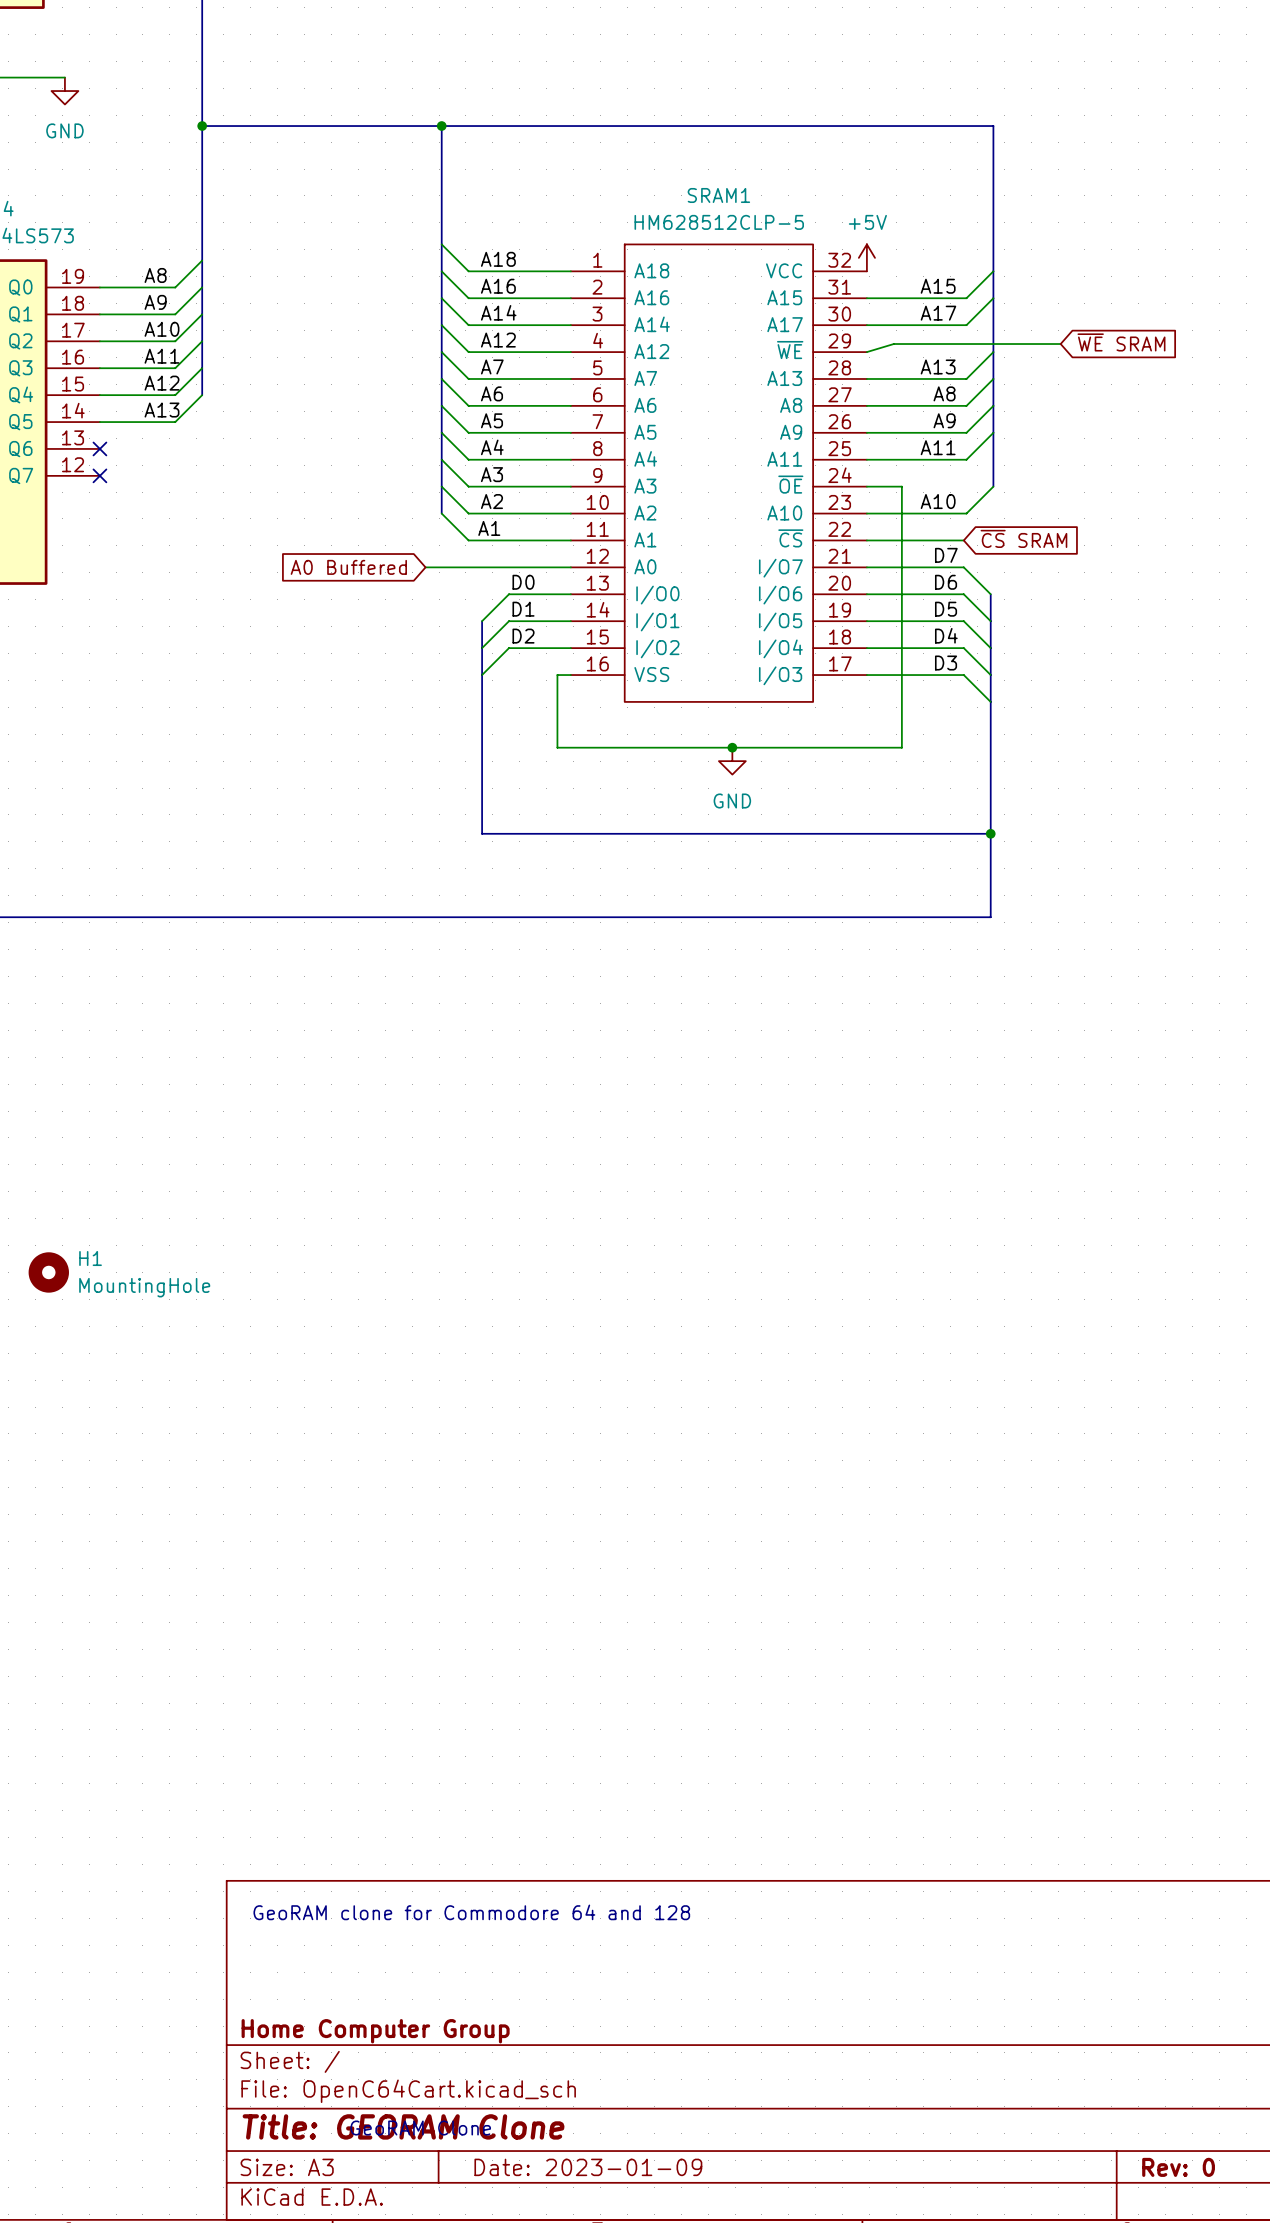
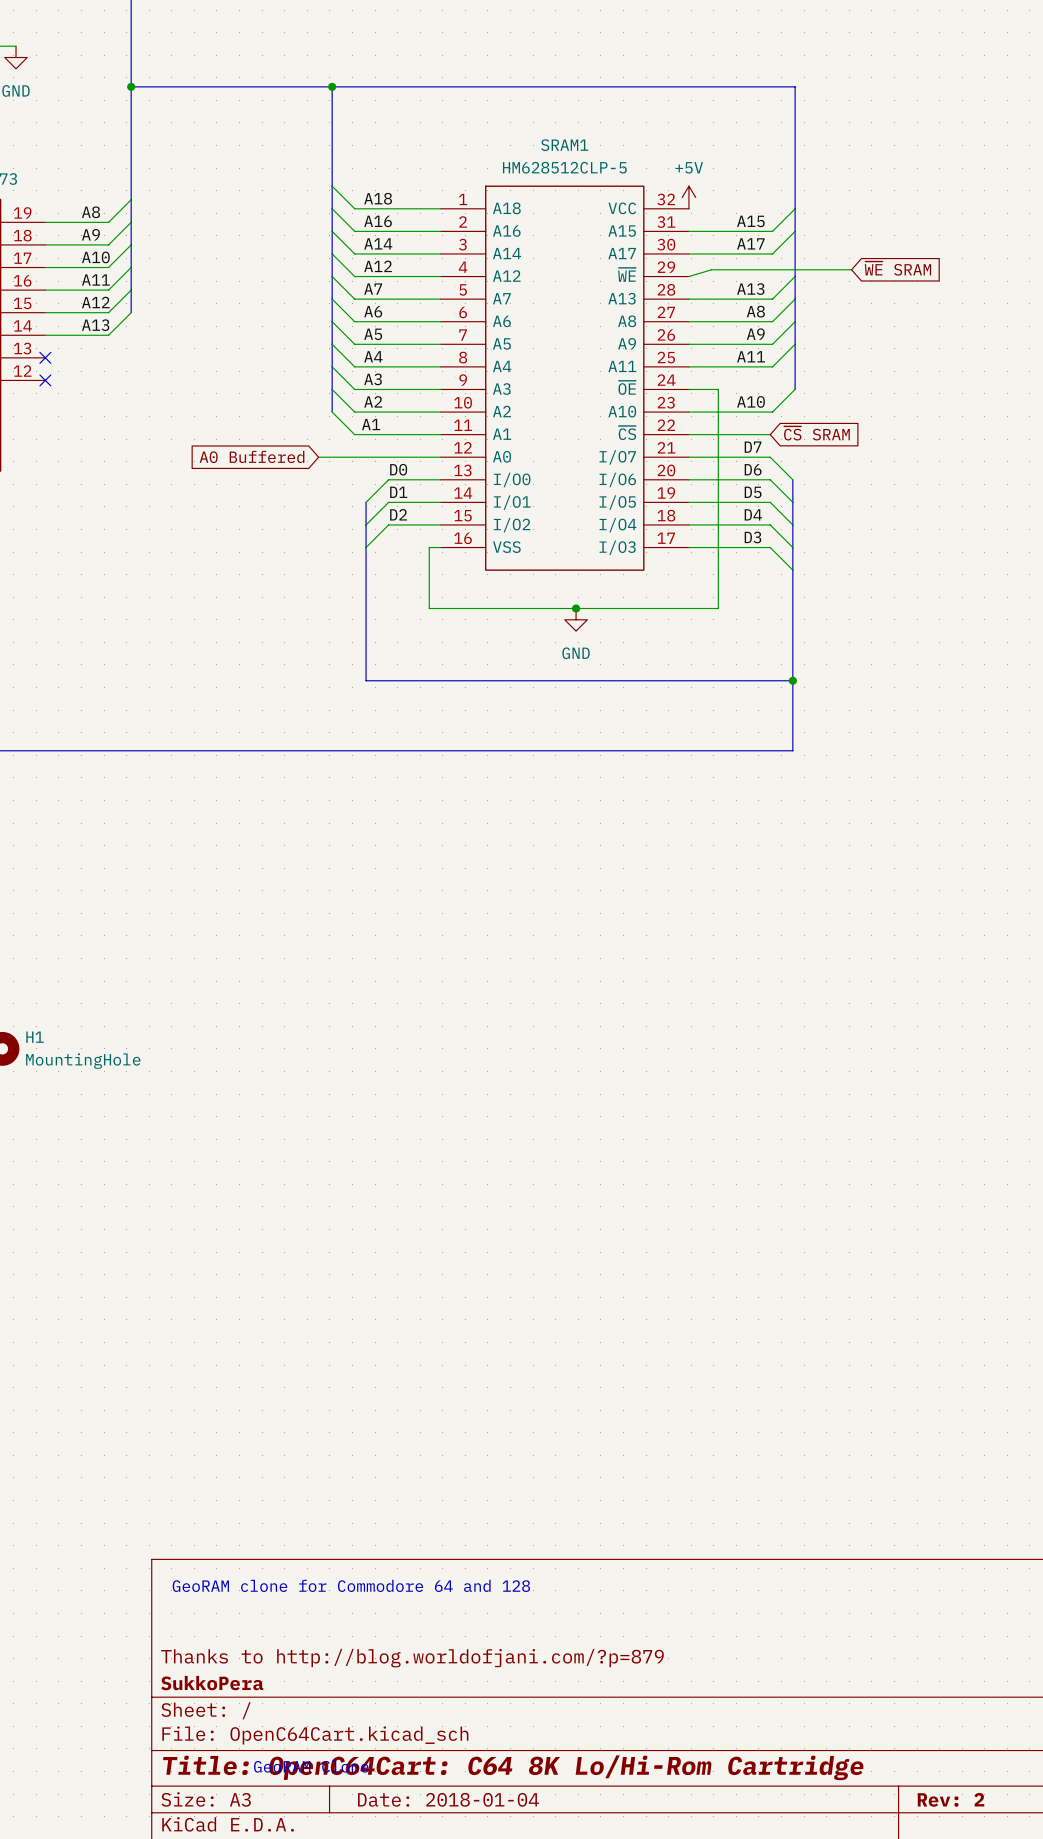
title block: none -> Thanks to http://blog.worldofjani.com/?p=879 (412, 1658)
title block: Home Computer Group (375, 2031) -> SukkoPera (212, 1683)
title block: Title: GEORAM Clone (403, 2126) -> Title: OpenC64Cart: C64 8K Lo/Hi-Rom Cartridge (513, 1767)
title block: Date: 2023-01-09 (588, 2167) -> Date: 2018-01-04 (448, 1799)
title block: Rev: 0 (1178, 2167) -> Rev: 2 (951, 1799)

